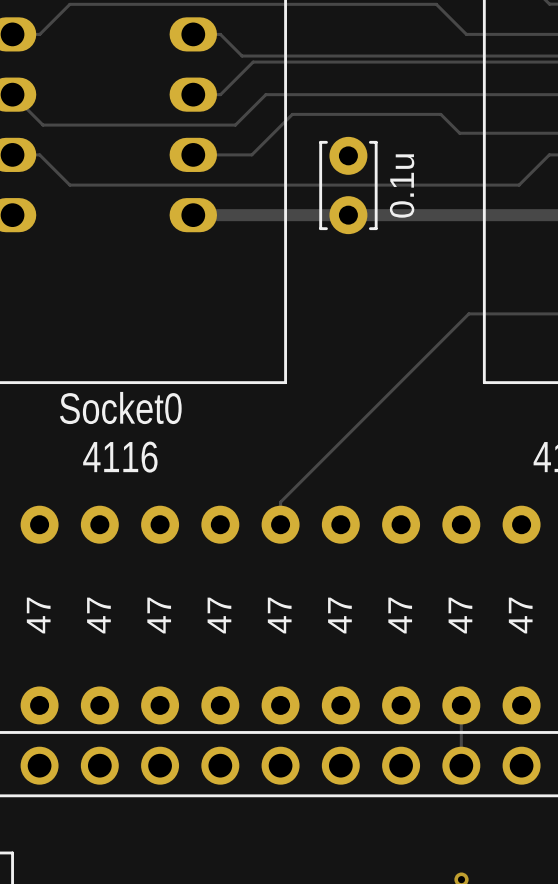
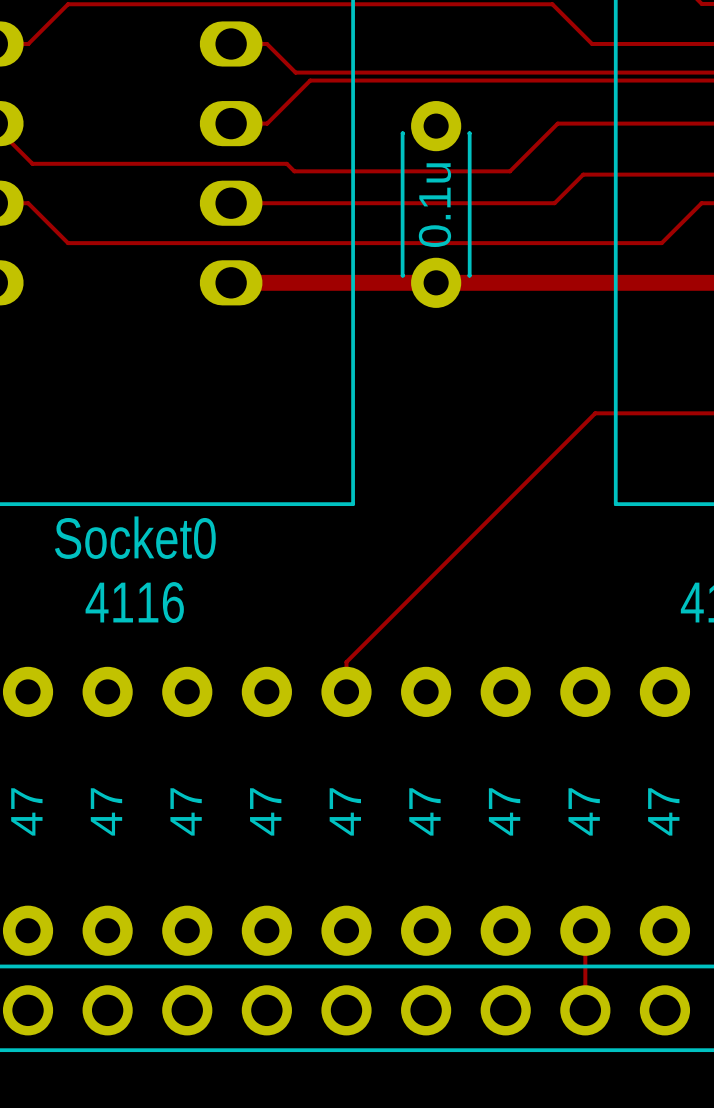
track: (440, 94) (265, 94) (235, 125) -> (557, 123) (510, 171) (294, 171) (286, 163)
track: (459, 133) (440, 114) (292, 114) (251, 154) -> (583, 174) (554, 203) (308, 203)
part: none -> 0.1u (436, 204)
part: 0.1u (348, 185) -> none

